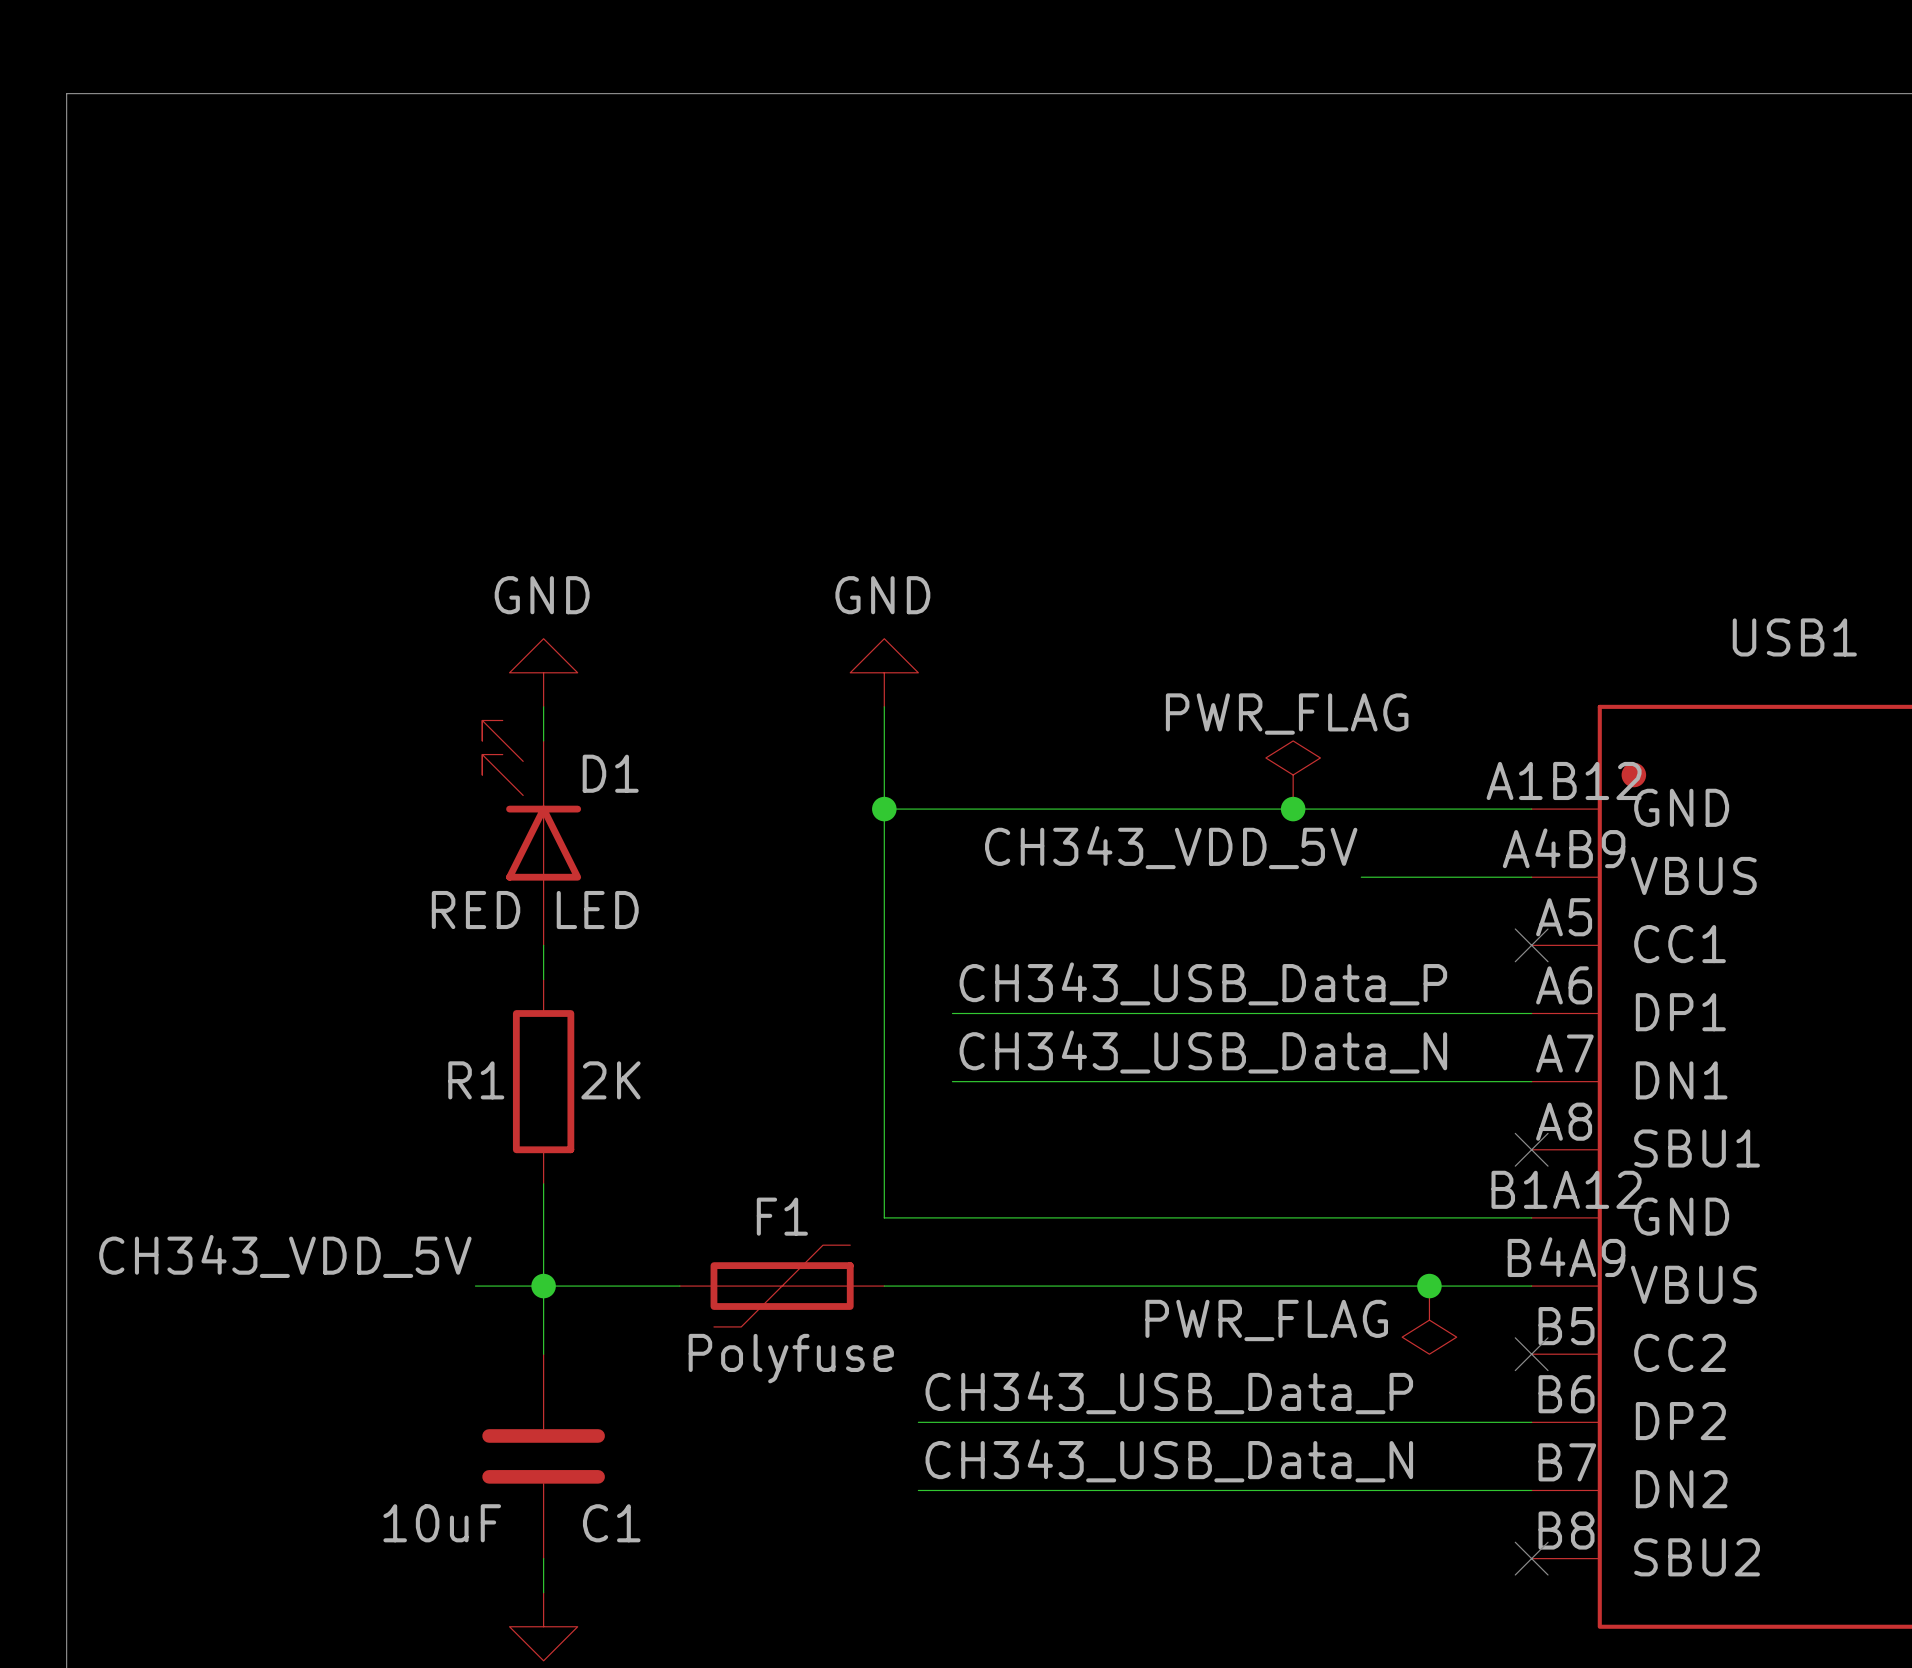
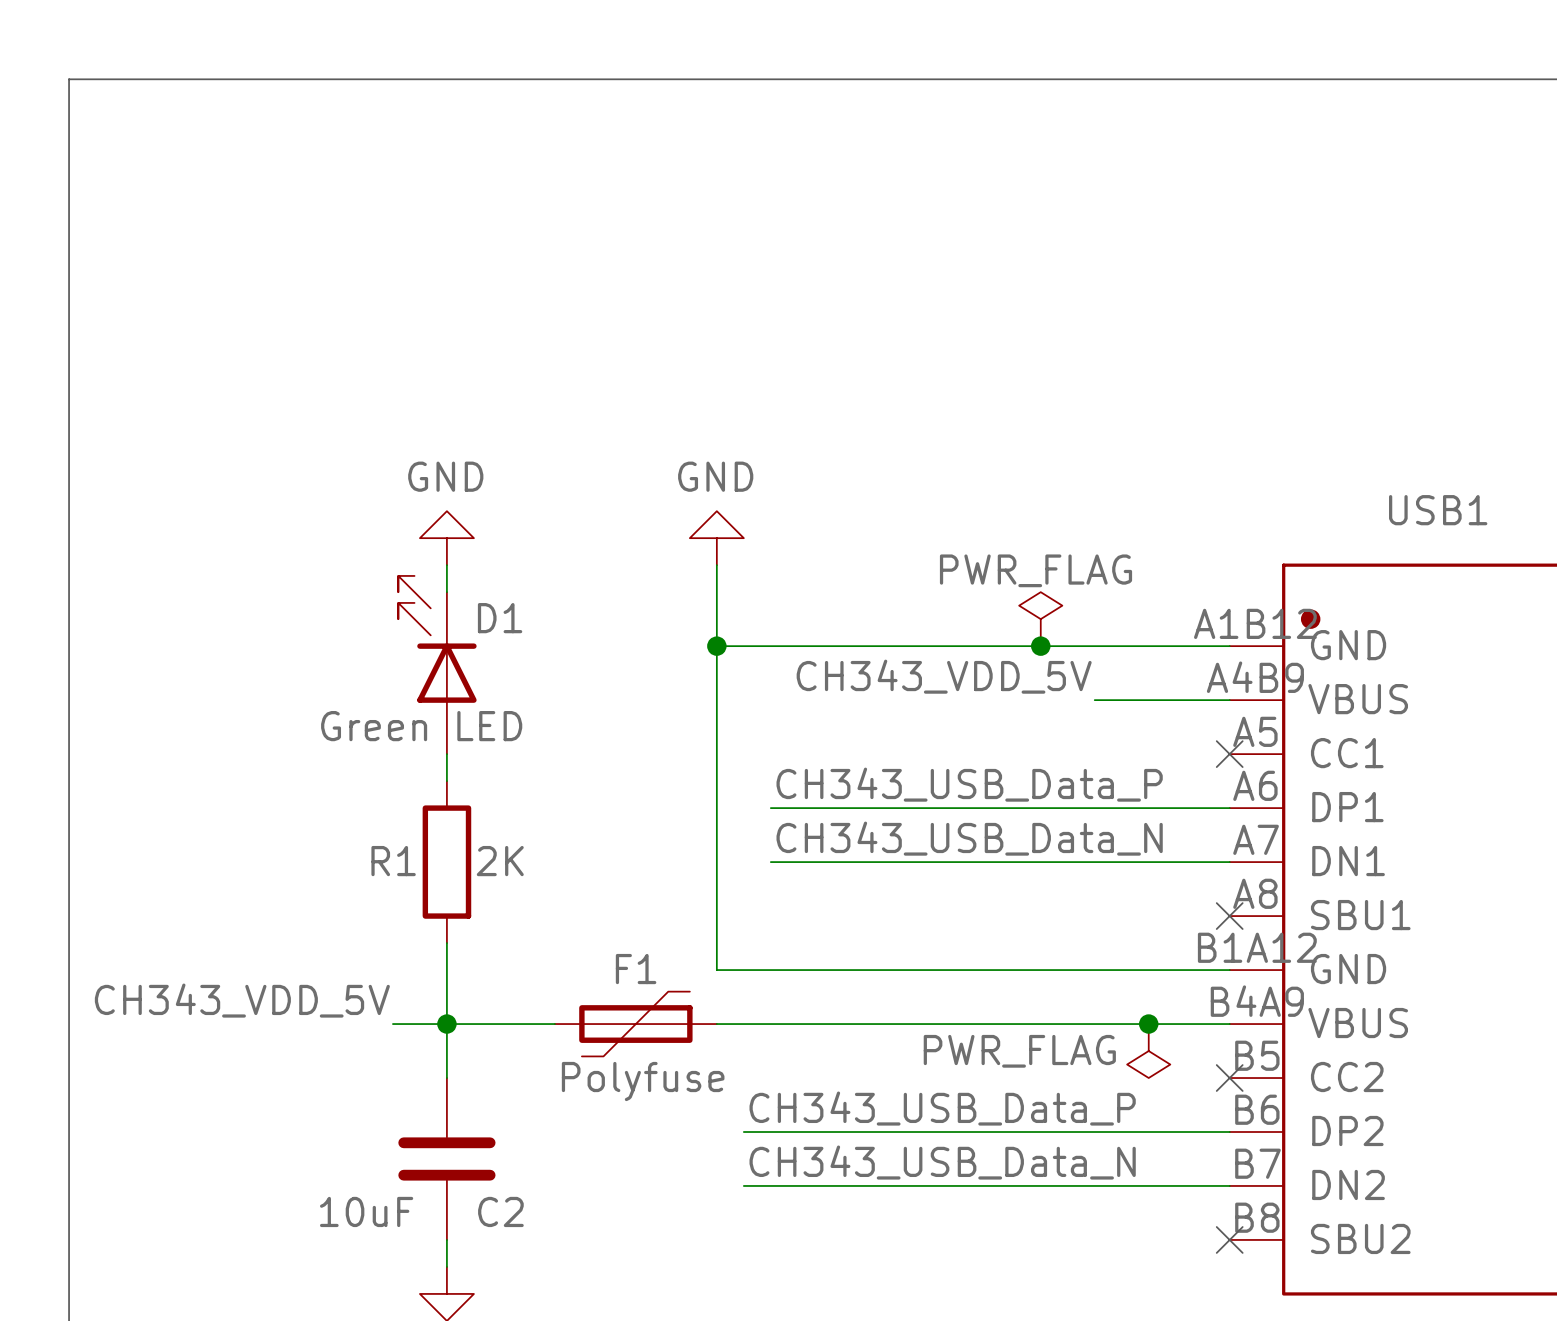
D1 value: RED LED (535, 910) -> Green LED (421, 726)
C1 name: C1 (611, 1523) -> C2 (500, 1211)

